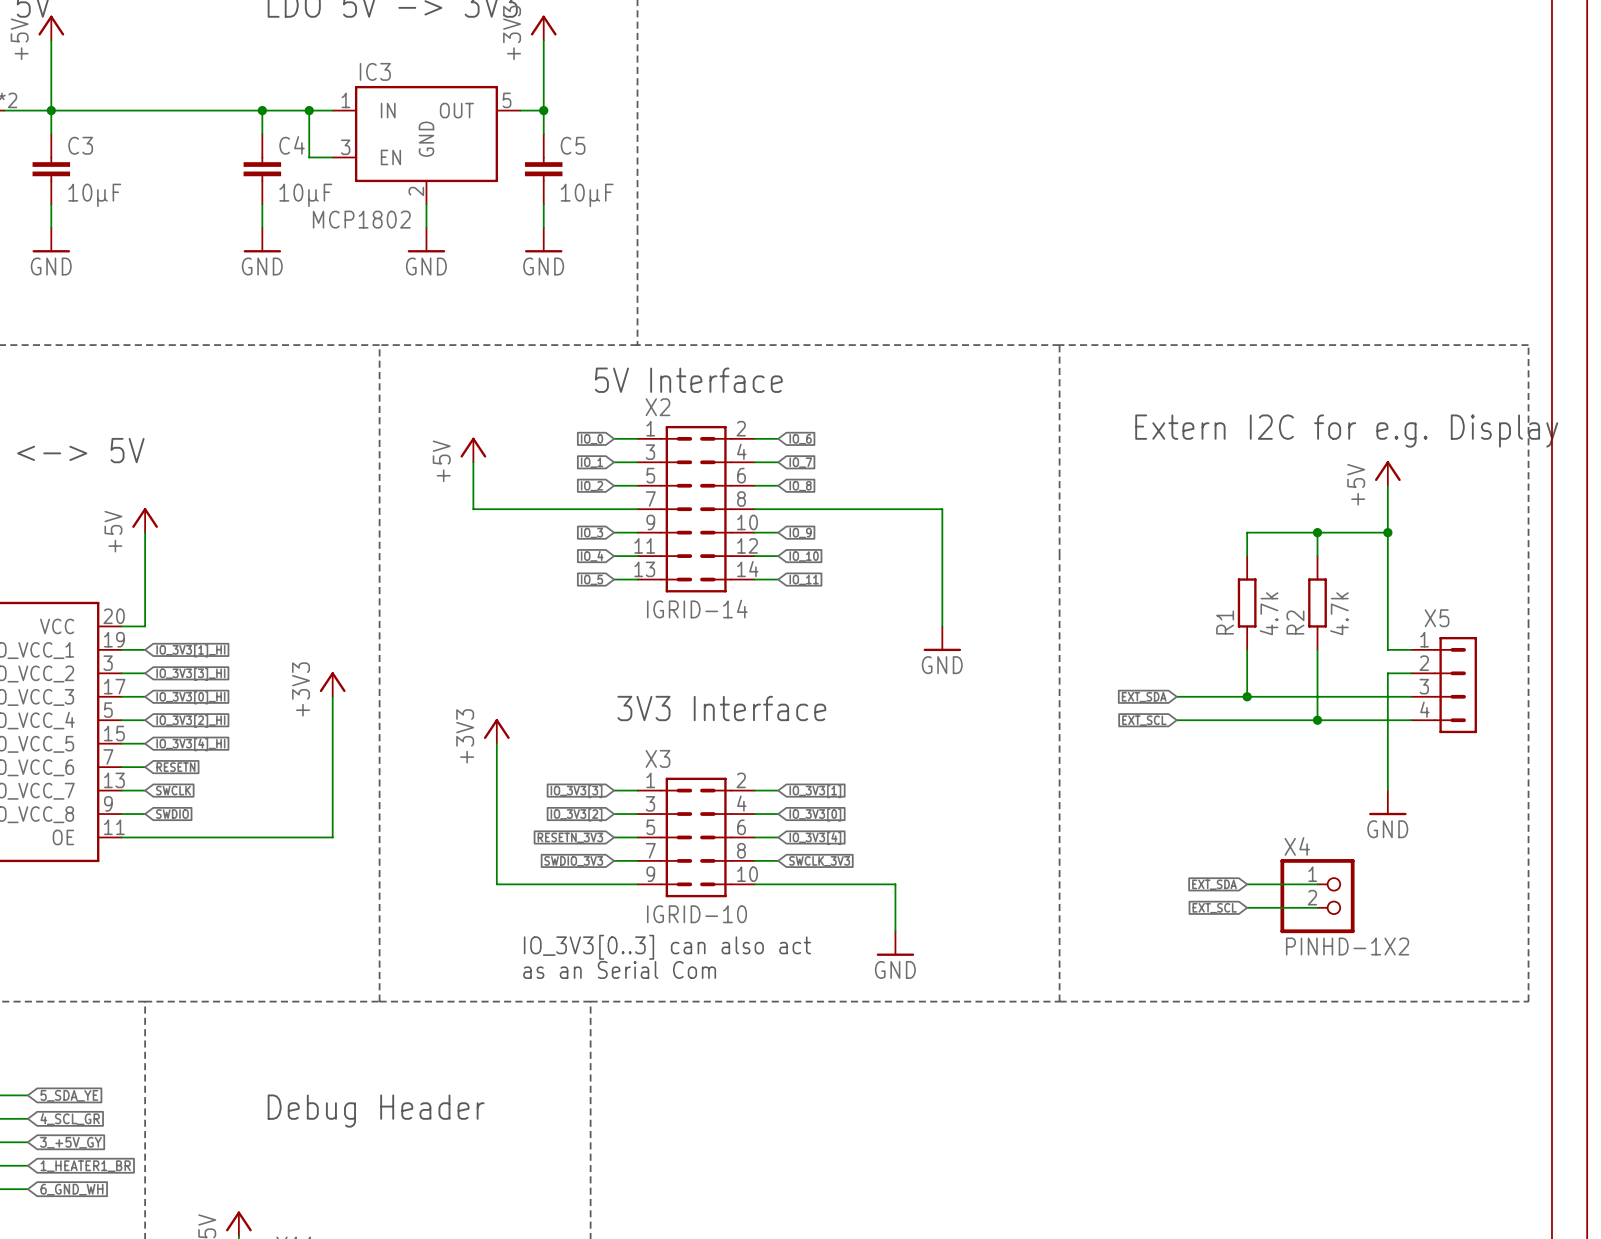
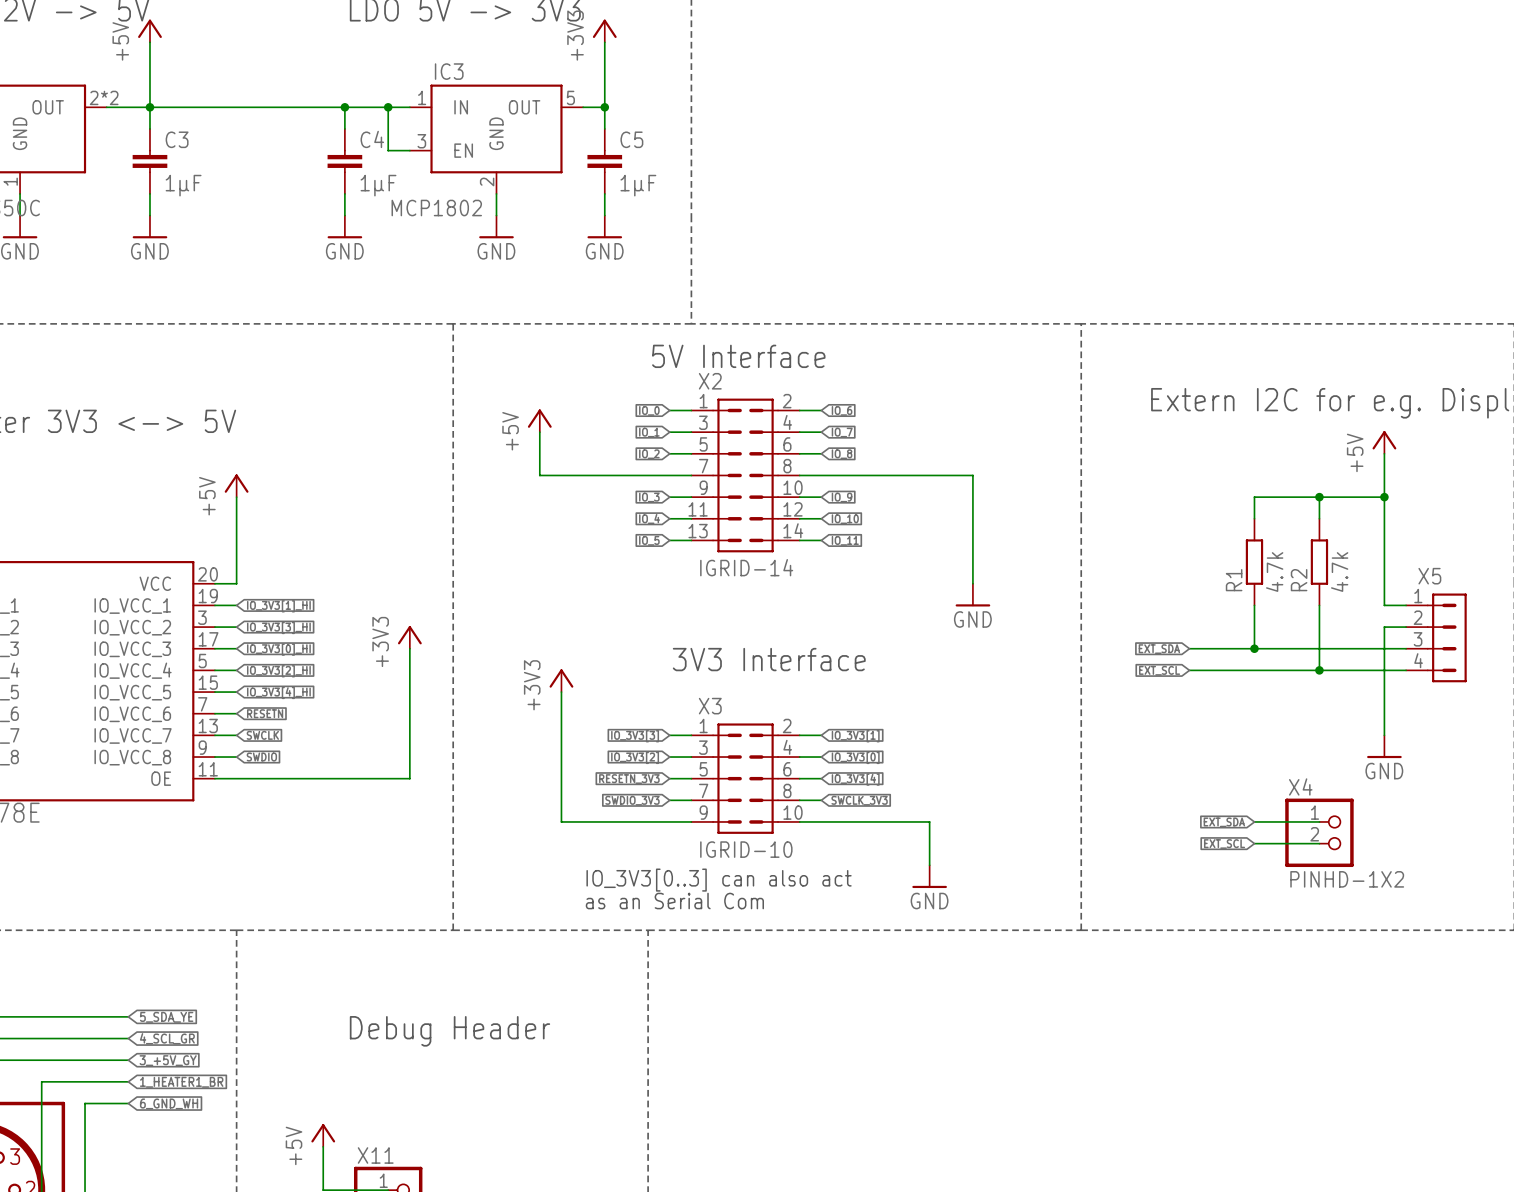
C3 value: 10µF (94, 195) -> 1µF (183, 185)
C4 value: 10µF (305, 195) -> 1µF (378, 185)
C5 value: 10µF (587, 195) -> 1µF (638, 185)

